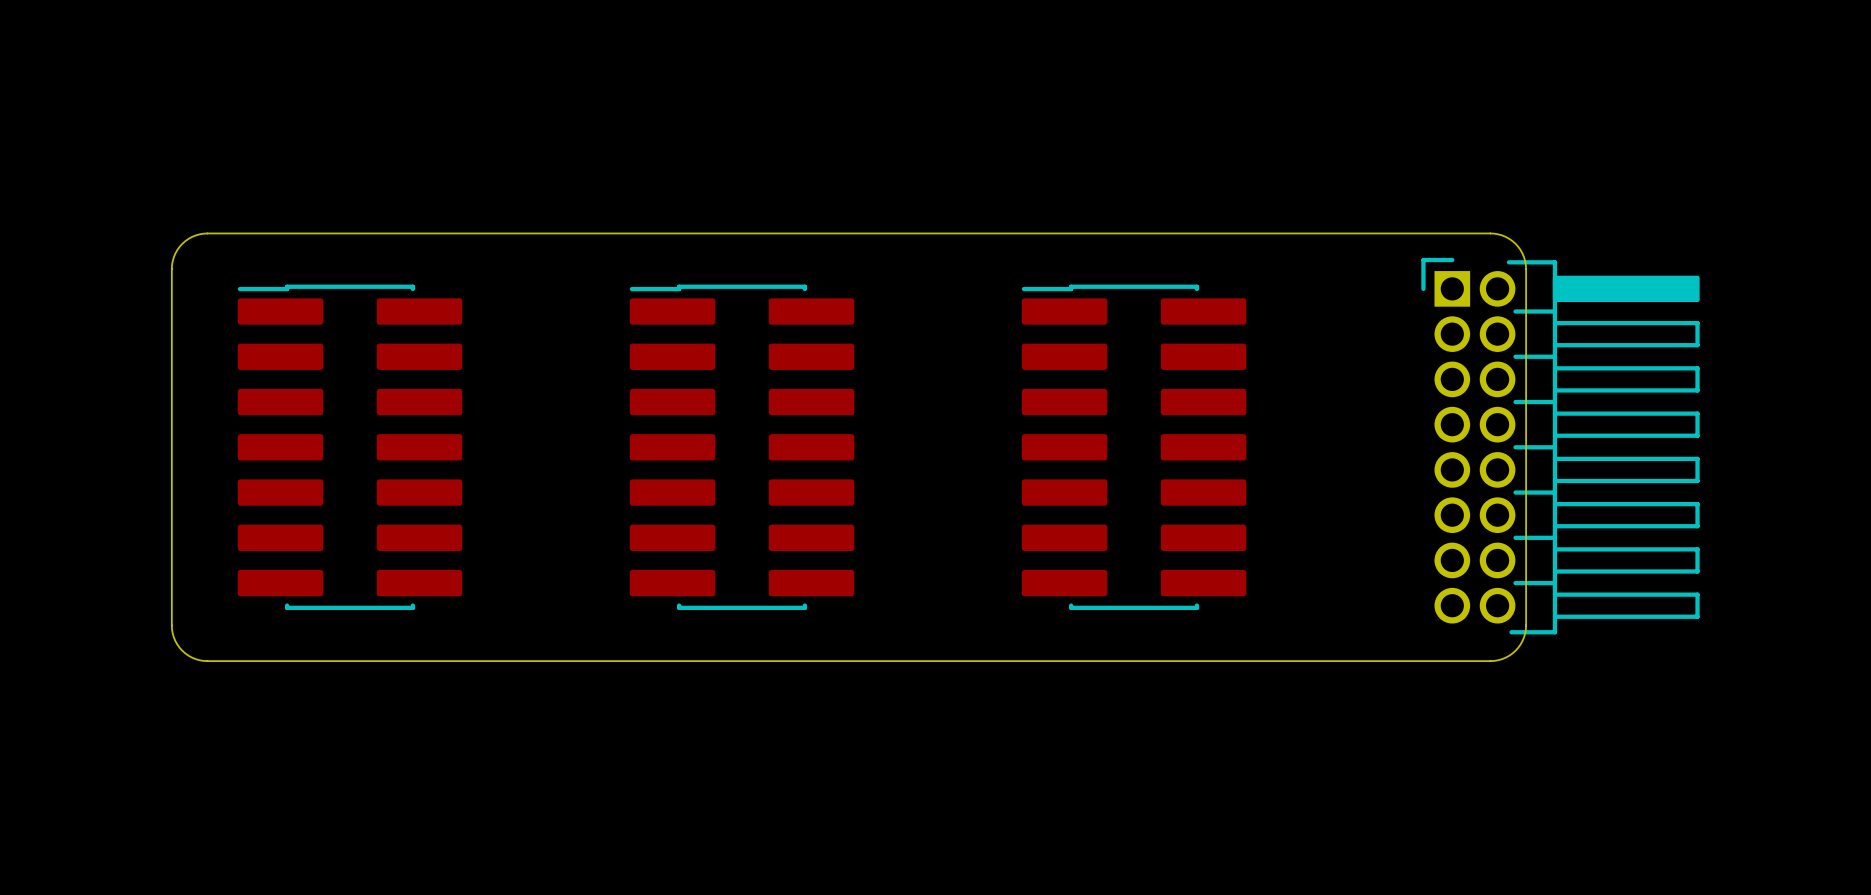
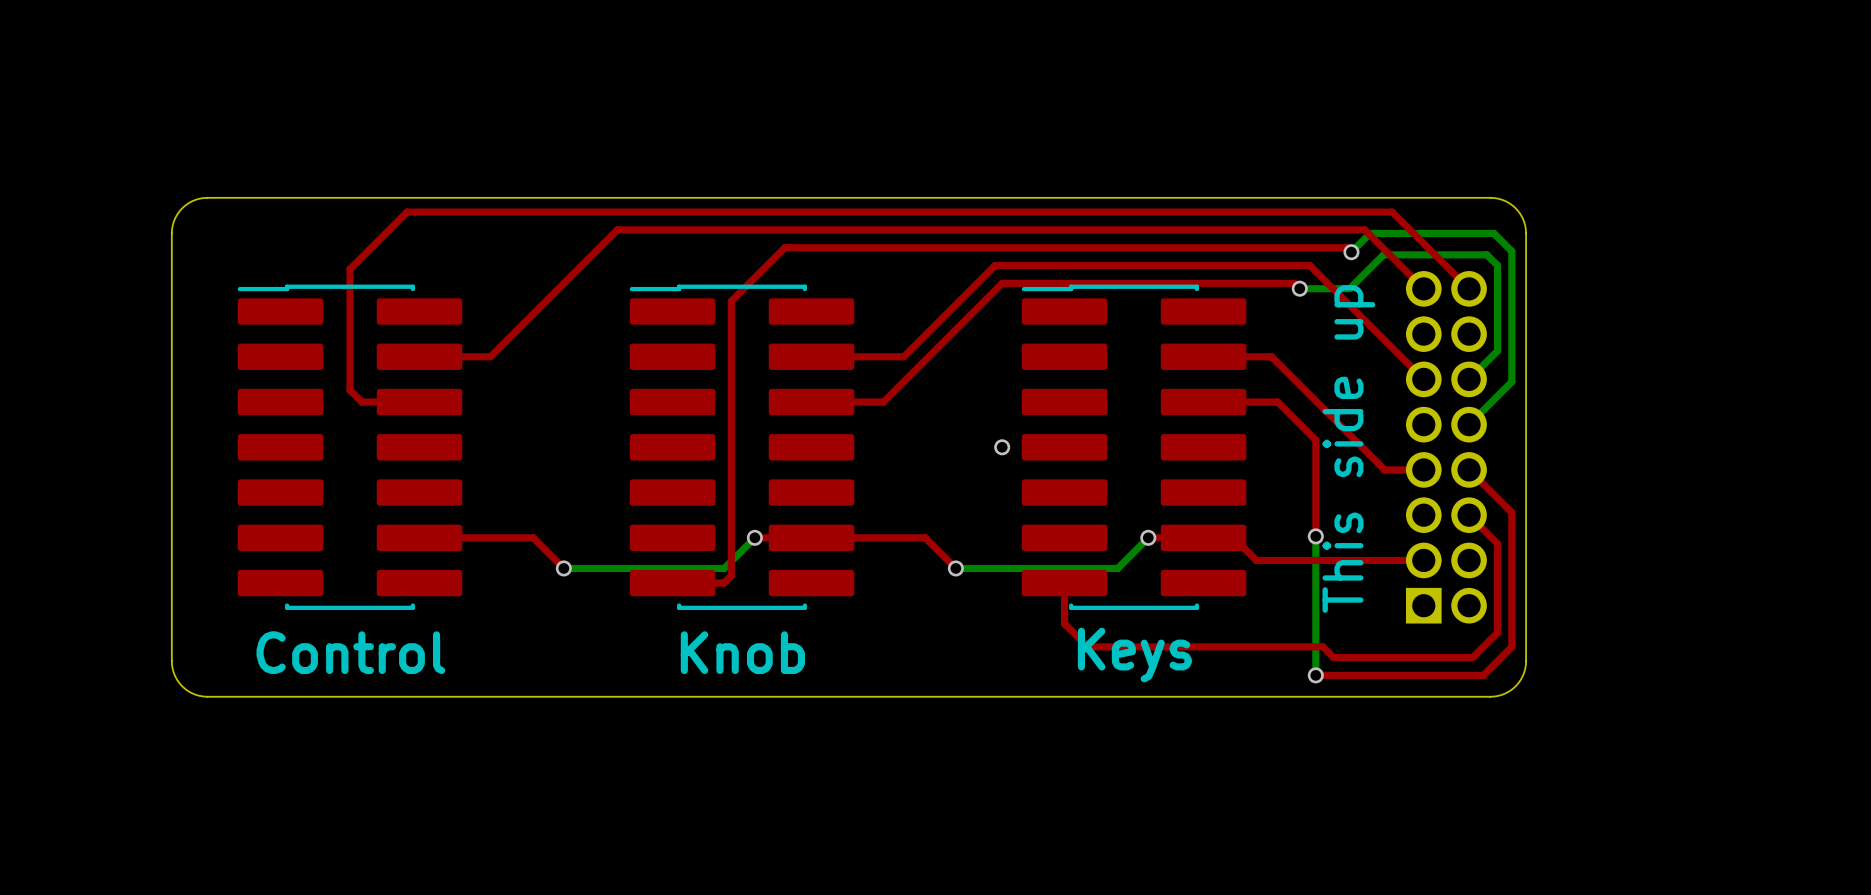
top track: none -> (1351, 252) (1347, 247) (784, 247) (731, 301) (731, 575) (723, 583) (672, 583)
bottom track: none -> (1351, 252) (1370, 233) (1494, 233) (1511, 251) (1511, 381) (1469, 424)
via: none -> (1351, 252)
board edge: (171, 269) (175, 253) (182, 243) (195, 235) (207, 233) (1490, 233) (1502, 235) (1515, 243) (1524, 257) (1526, 269) -> (171, 269) (172, 229) (175, 218) (188, 203) (207, 197) (1490, 197) (1509, 203) (1522, 218) (1525, 229) (1526, 269)
top track: none -> (1299, 288) (1294, 283) (1002, 283) (883, 402) (811, 402)
bottom track: none -> (1299, 288) (1349, 288) (1383, 254) (1486, 254) (1497, 265) (1497, 350) (1469, 379)
via: none -> (1299, 288)
top track: none -> (1423, 288) (1364, 229) (617, 229) (490, 356) (419, 356)
top track: none -> (1469, 288) (1392, 212) (407, 212) (350, 269) (350, 390) (361, 402) (419, 402)
top track: none -> (811, 356) (903, 356) (995, 265) (1309, 265) (1423, 379)
top track: none -> (1203, 356) (1271, 356) (1384, 469) (1423, 469)
top track: none -> (1203, 402) (1277, 402) (1315, 440) (1315, 536)
part side: top (1560, 446) -> bottom (1446, 447)
via: none -> (1002, 447)
text: none -> This side up (1348, 448)
top track: none -> (1469, 469) (1511, 512) (1511, 646) (1483, 675) (1315, 675)
top track: none -> (1469, 515) (1497, 543) (1497, 632) (1472, 657) (1333, 657) (1322, 646) (1087, 646) (1064, 623) (1064, 583)
bottom track: none -> (1315, 536) (1315, 675)
via: none -> (1315, 536)
top track: none -> (419, 537) (533, 537) (563, 568)
top track: none -> (754, 537) (925, 537) (955, 568)
bottom track: none -> (754, 537) (724, 568) (563, 568)
via: none -> (754, 537)
top track: none -> (1148, 537) (1233, 537) (1256, 560) (1423, 560)
bottom track: none -> (1148, 537) (1117, 568) (955, 568)
via: none -> (1148, 537)
via: none -> (563, 568)
via: none -> (955, 568)
board edge: (171, 625) (173, 637) (182, 650) (191, 657) (207, 661) (1490, 661) (1502, 659) (1515, 650) (1524, 637) (1526, 625) -> (171, 625) (172, 665) (175, 676) (188, 691) (207, 696) (1490, 696) (1509, 691) (1522, 676) (1525, 665) (1526, 625)
text: none -> Control (350, 652)
text: none -> Knob (742, 652)
text: none -> Keys (1134, 655)
via: none -> (1315, 675)

